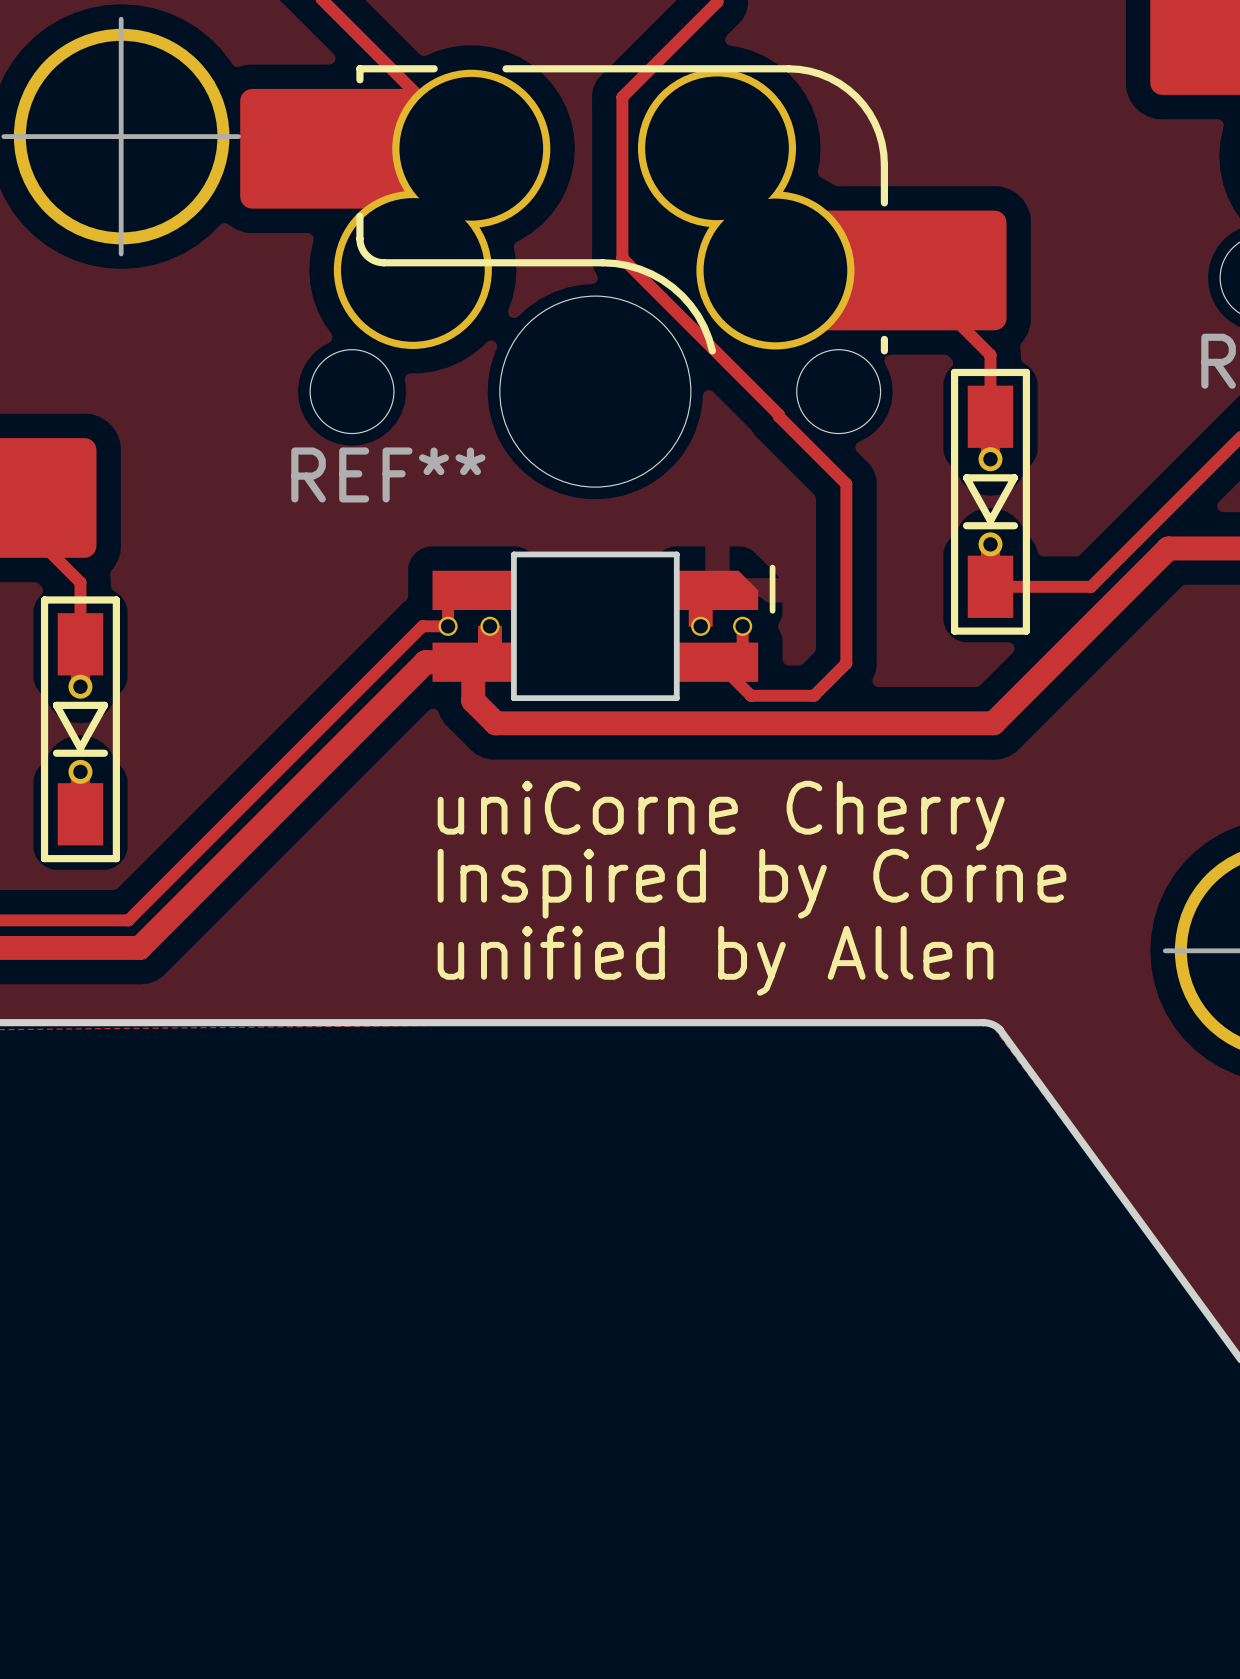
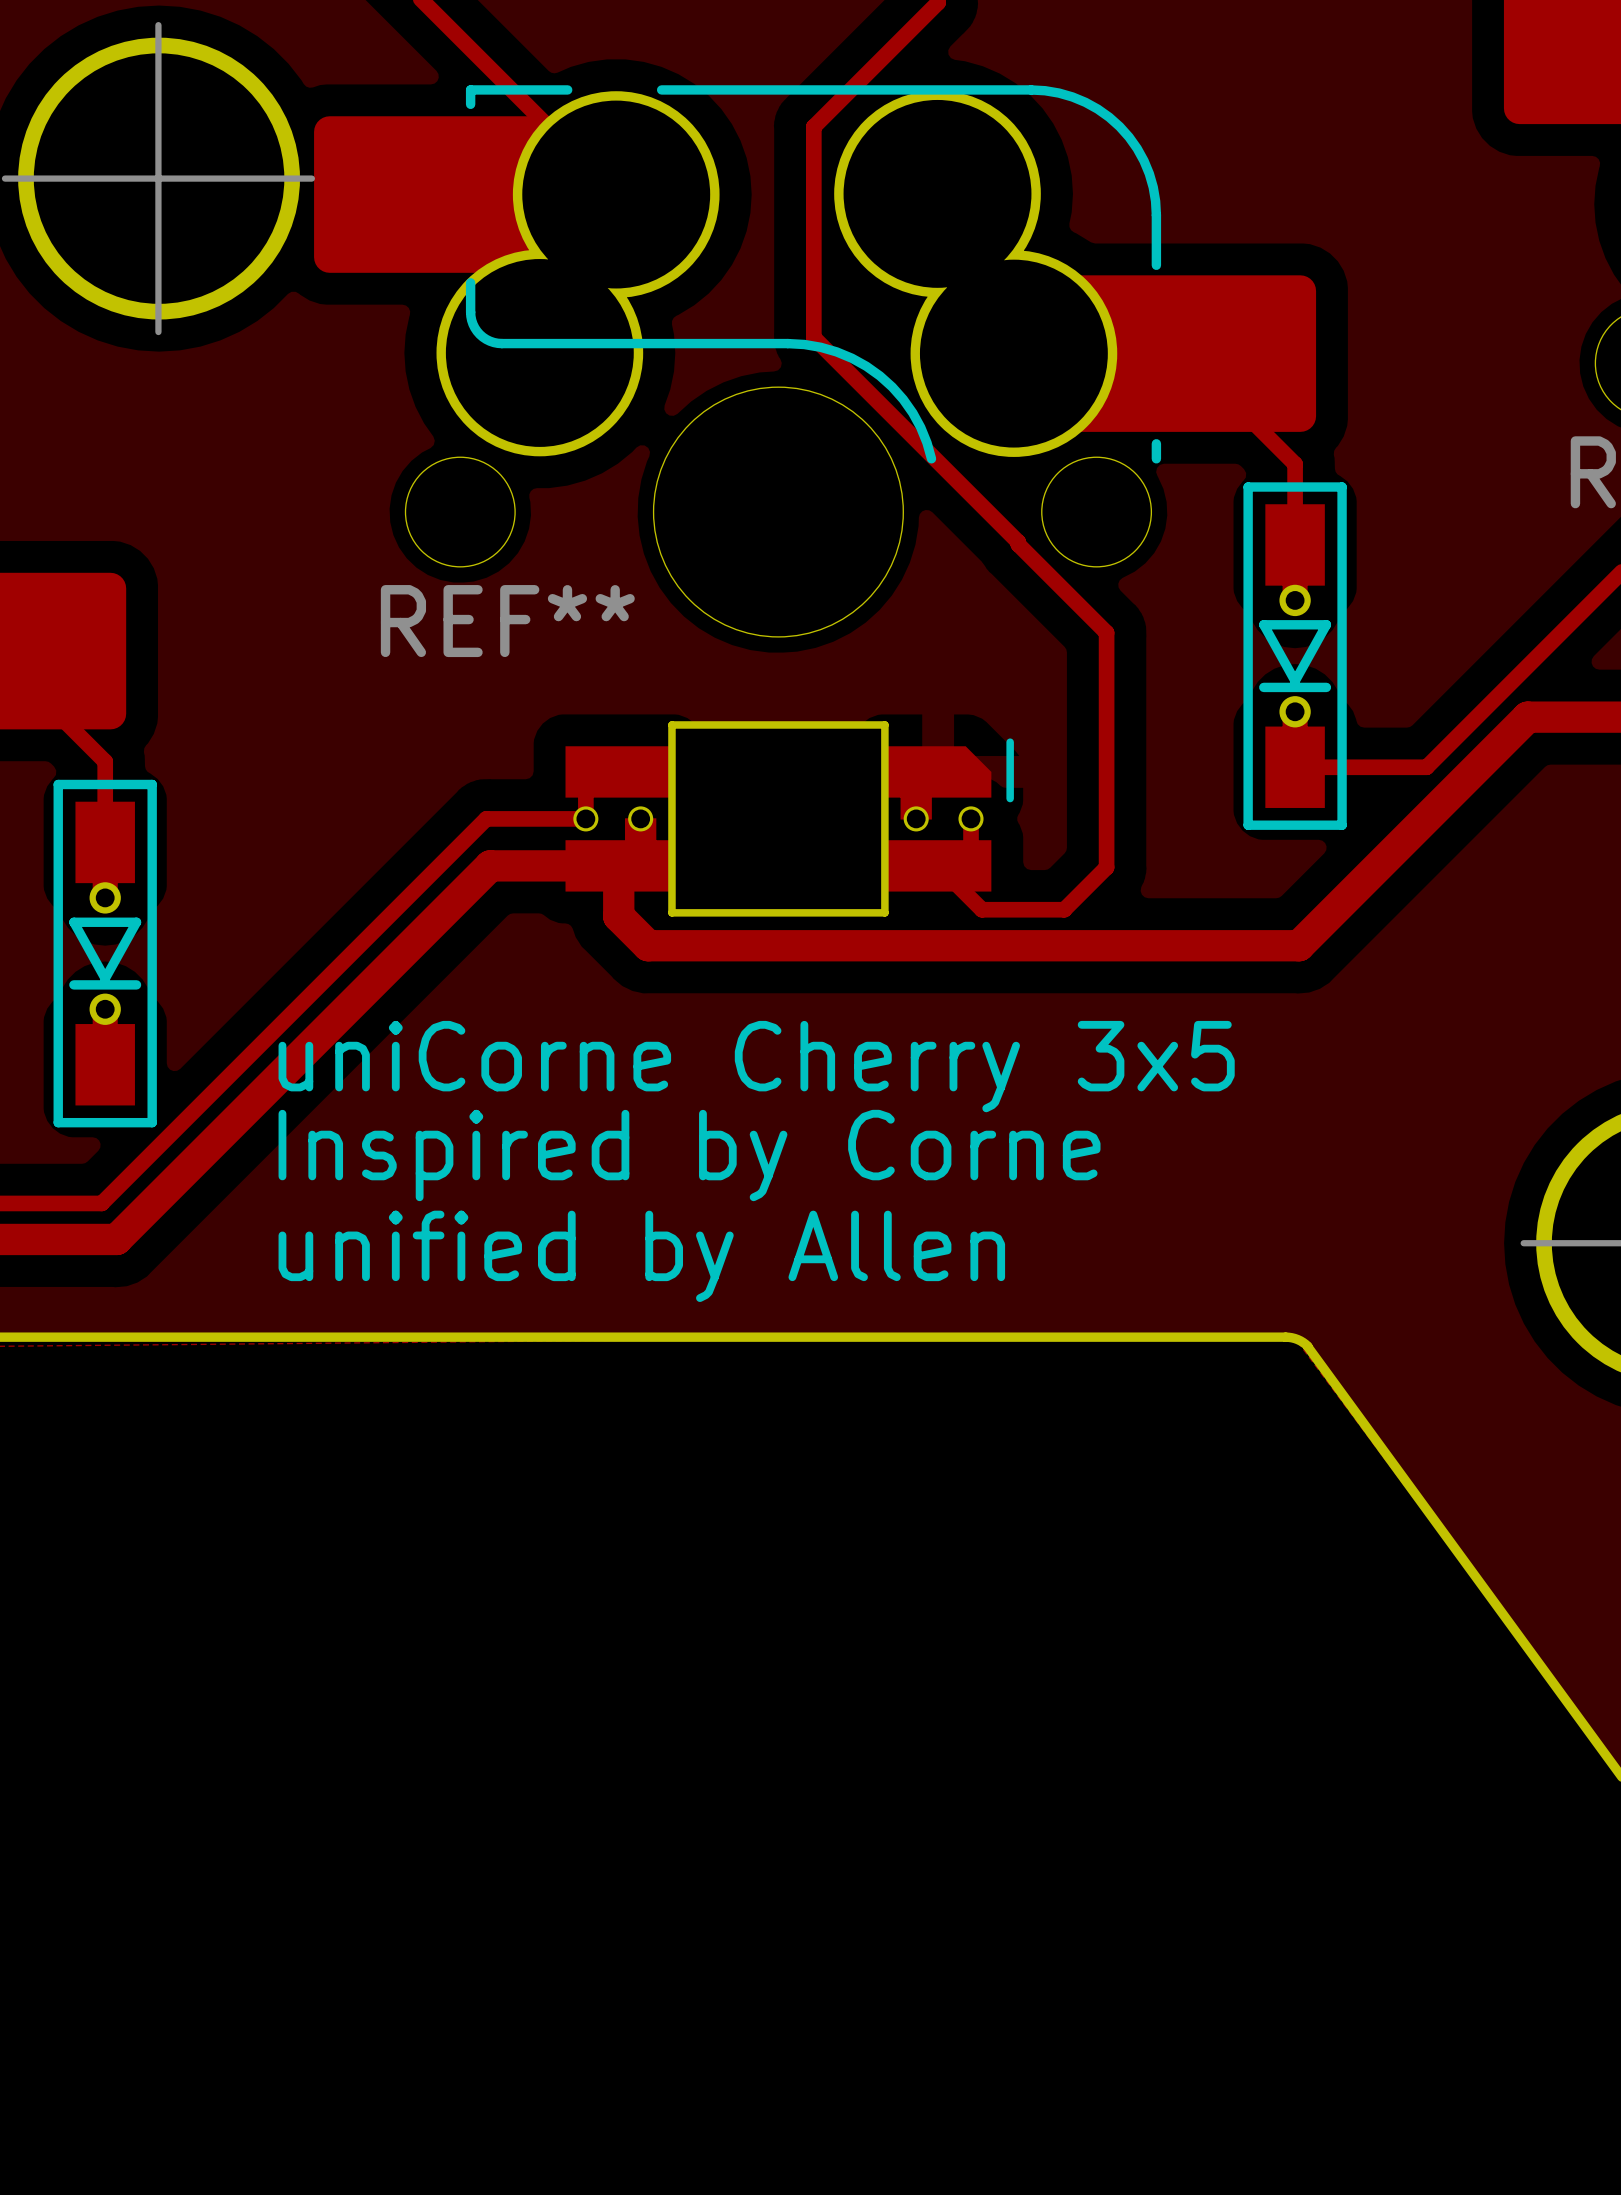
track: (422, 626) (128, 920) (77, 920) -> (552, 818) (486, 818) (101, 1203)
track: (425, 662) (139, 947) (89, 947) -> (556, 865) (490, 865) (116, 1239)
text: uniCorne Cherry (721, 815) -> uniCorne Cherry 3x5 (756, 1066)
text position: Inspired by Corne (751, 883) -> Inspired by Corne (689, 1155)
text position: unified by Allen (715, 960) -> unified by Allen (641, 1256)

